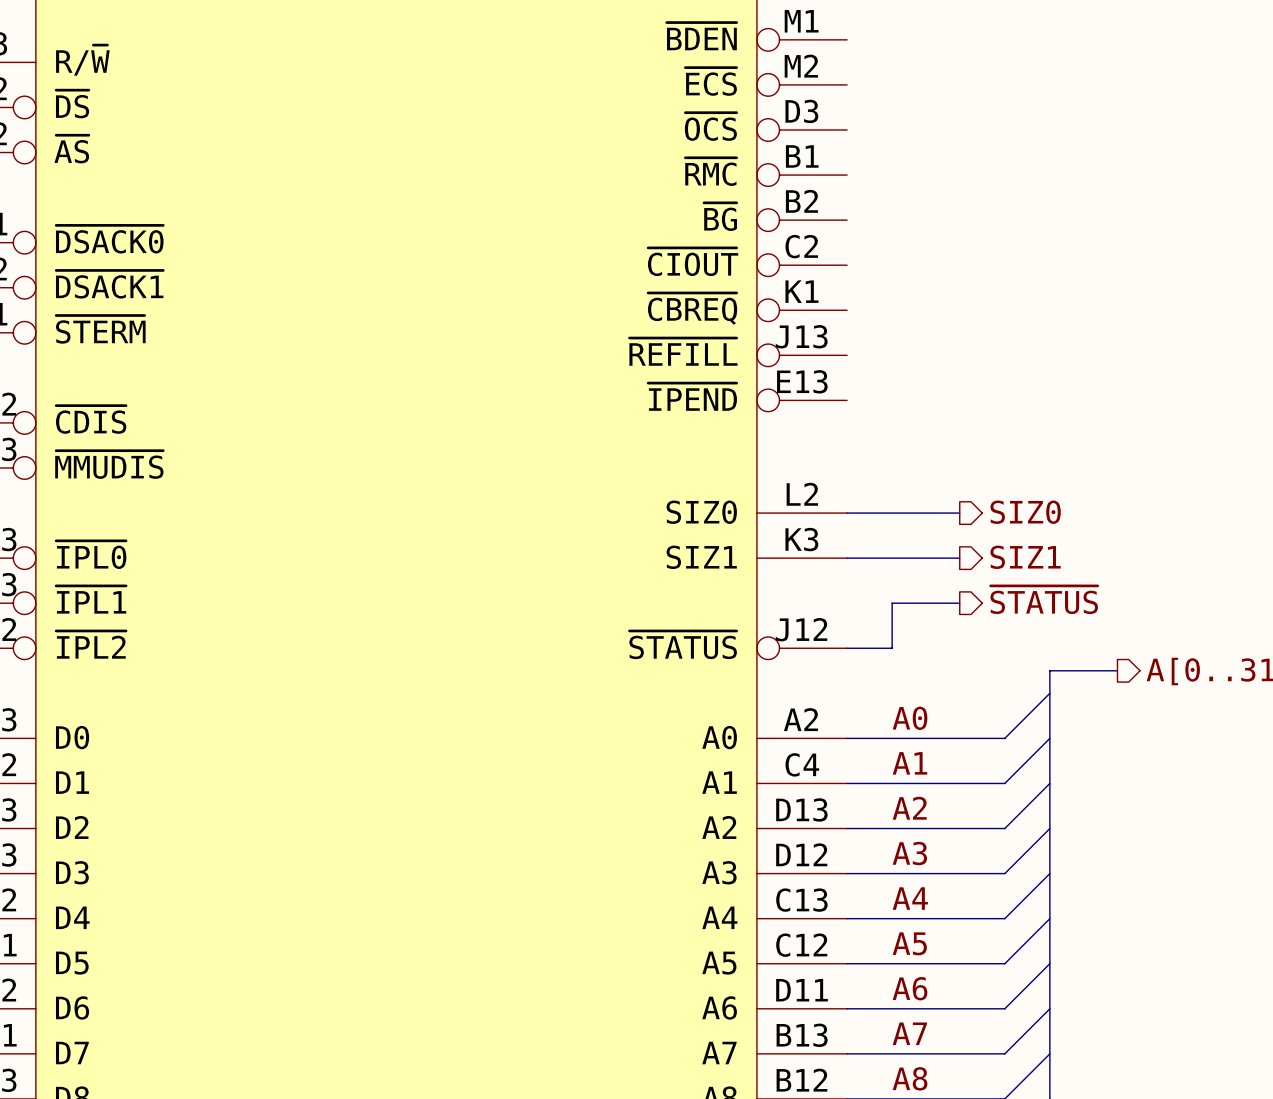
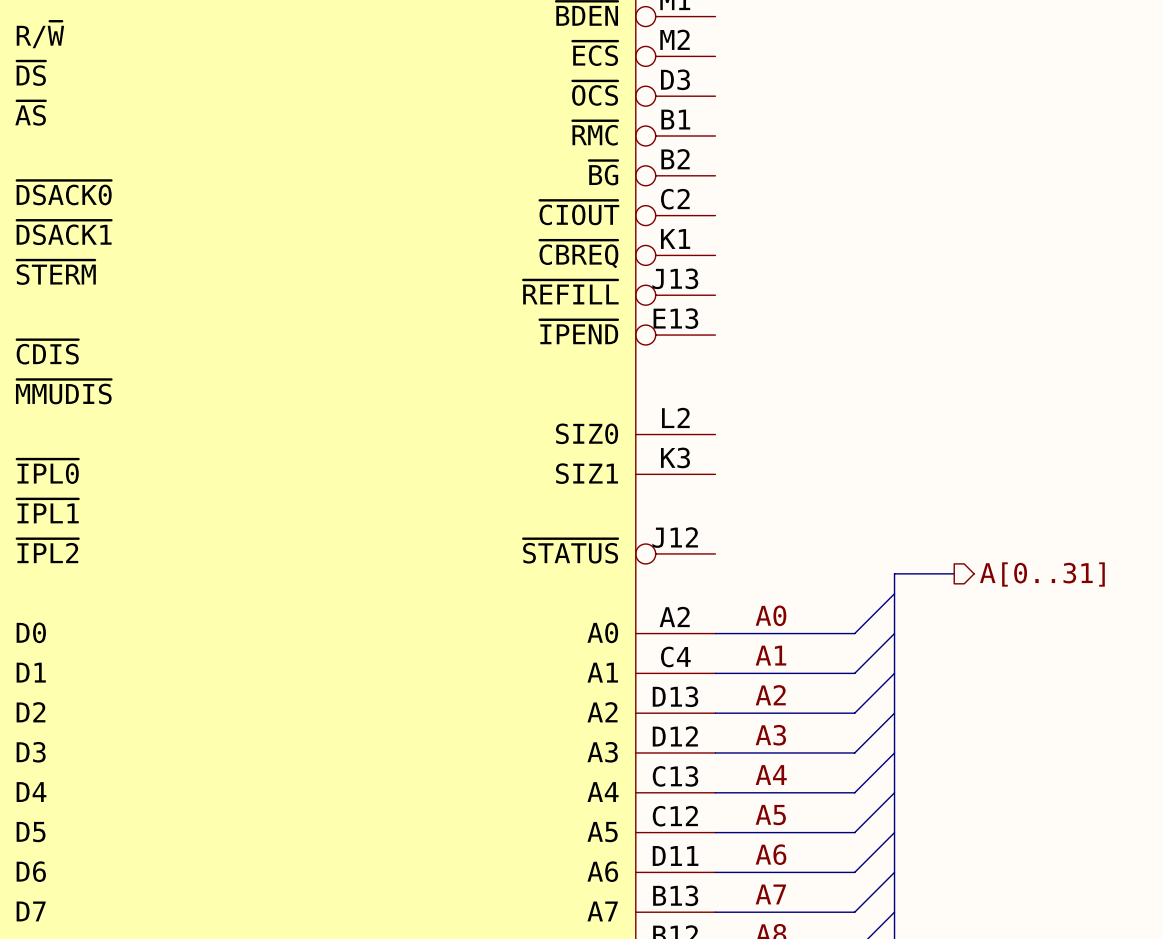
hierarchical label: SIZ0 (1025, 512) -> none
wire: (847, 513) (959, 513) -> none
hierarchical label: SIZ1 (1025, 557) -> none
wire: (847, 558) (959, 558) -> none
hierarchical label: ~{STATUS} (1044, 599) -> none
wire: (959, 603) (892, 603) (892, 648) (847, 648) -> none

